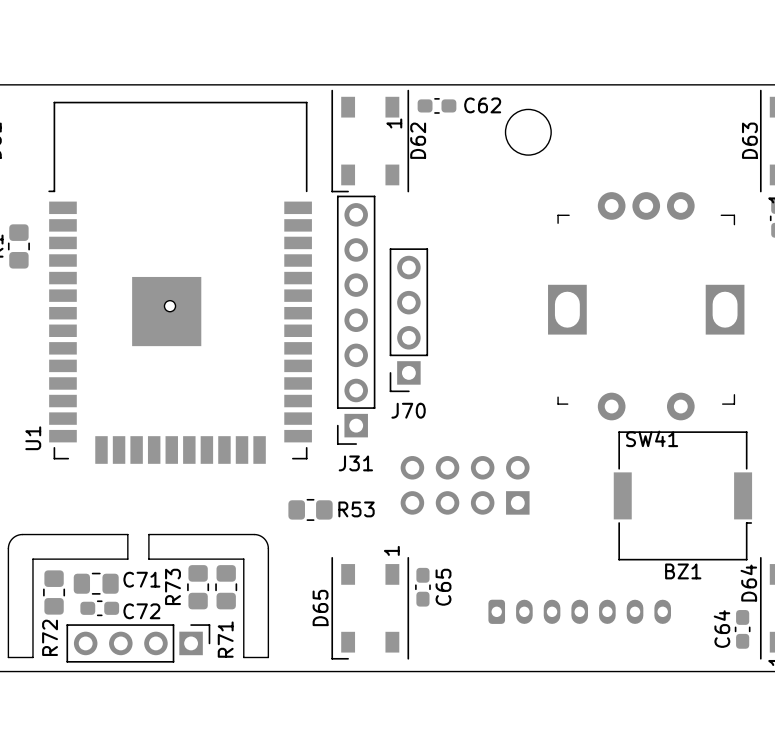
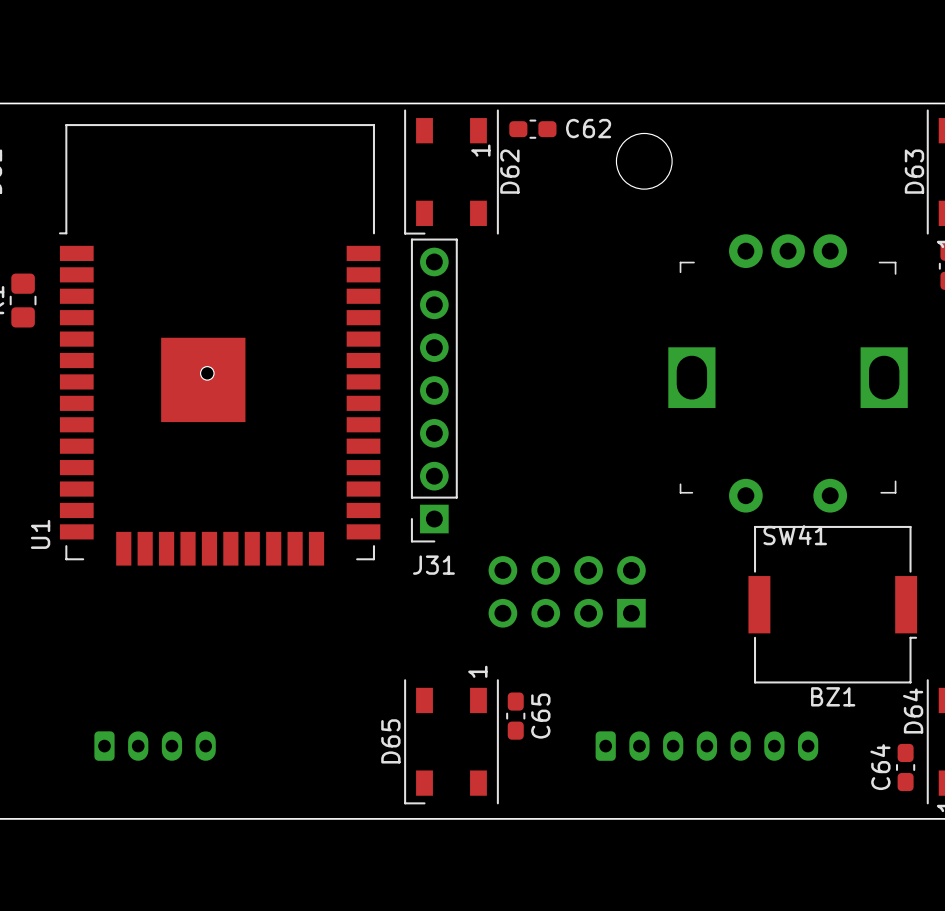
J70: (408, 320) -> none
R53: (310, 509) -> none
board edge: (22, 534) (127, 534) (127, 559) (32, 559) (32, 657) (8, 657) (8, 546) (13, 537) (22, 534) -> none
board edge: (148, 534) (254, 534) (264, 538) (268, 548) (268, 657) (243, 657) (243, 559) (148, 559) (148, 534) -> none
C72: (96, 583) -> none
R71: (198, 587) -> none
R73: (226, 587) -> none
R72: (54, 592) -> none
C71: (99, 608) -> none
part: none -> (155, 746)
part: (138, 643) -> none

